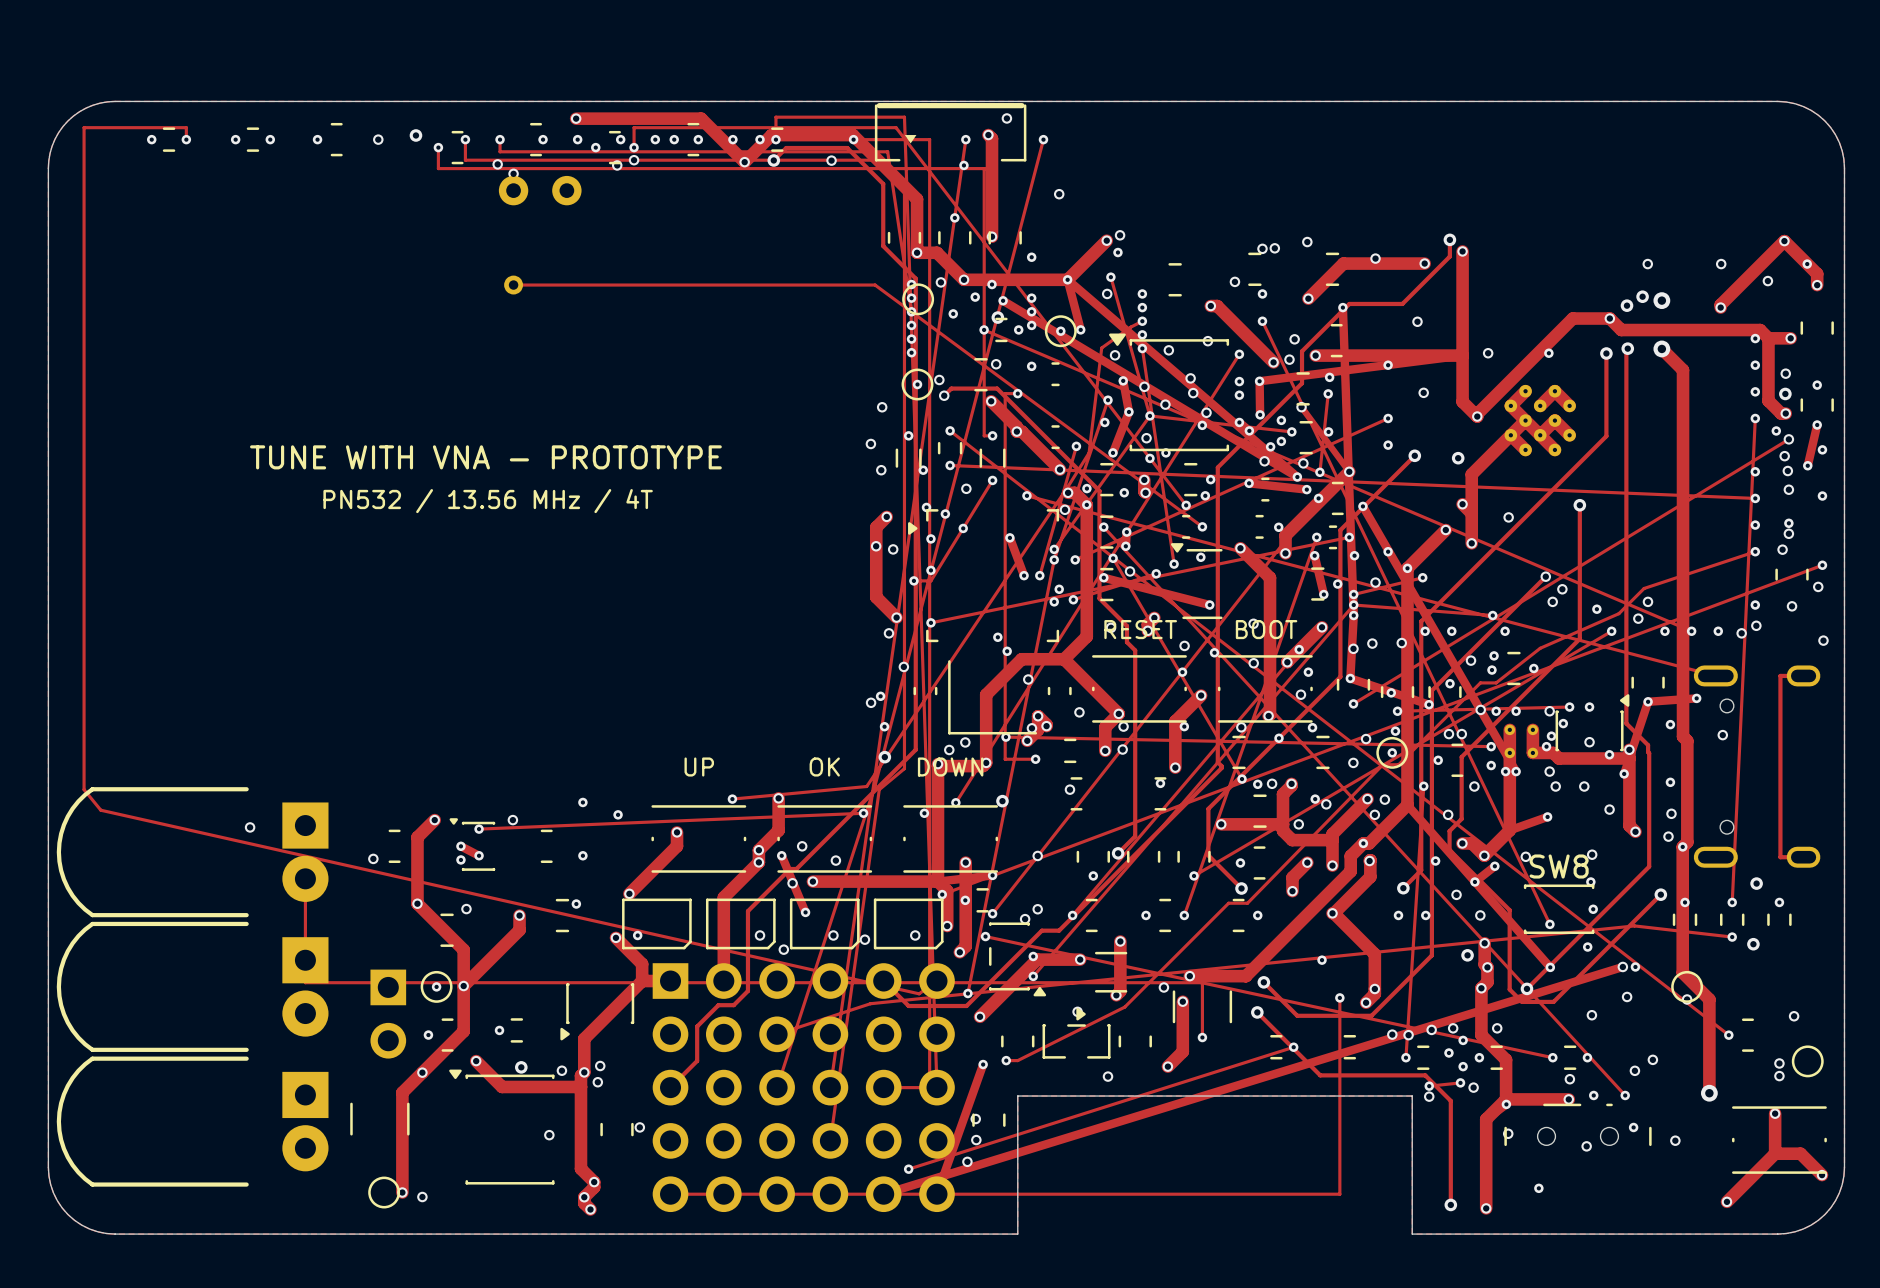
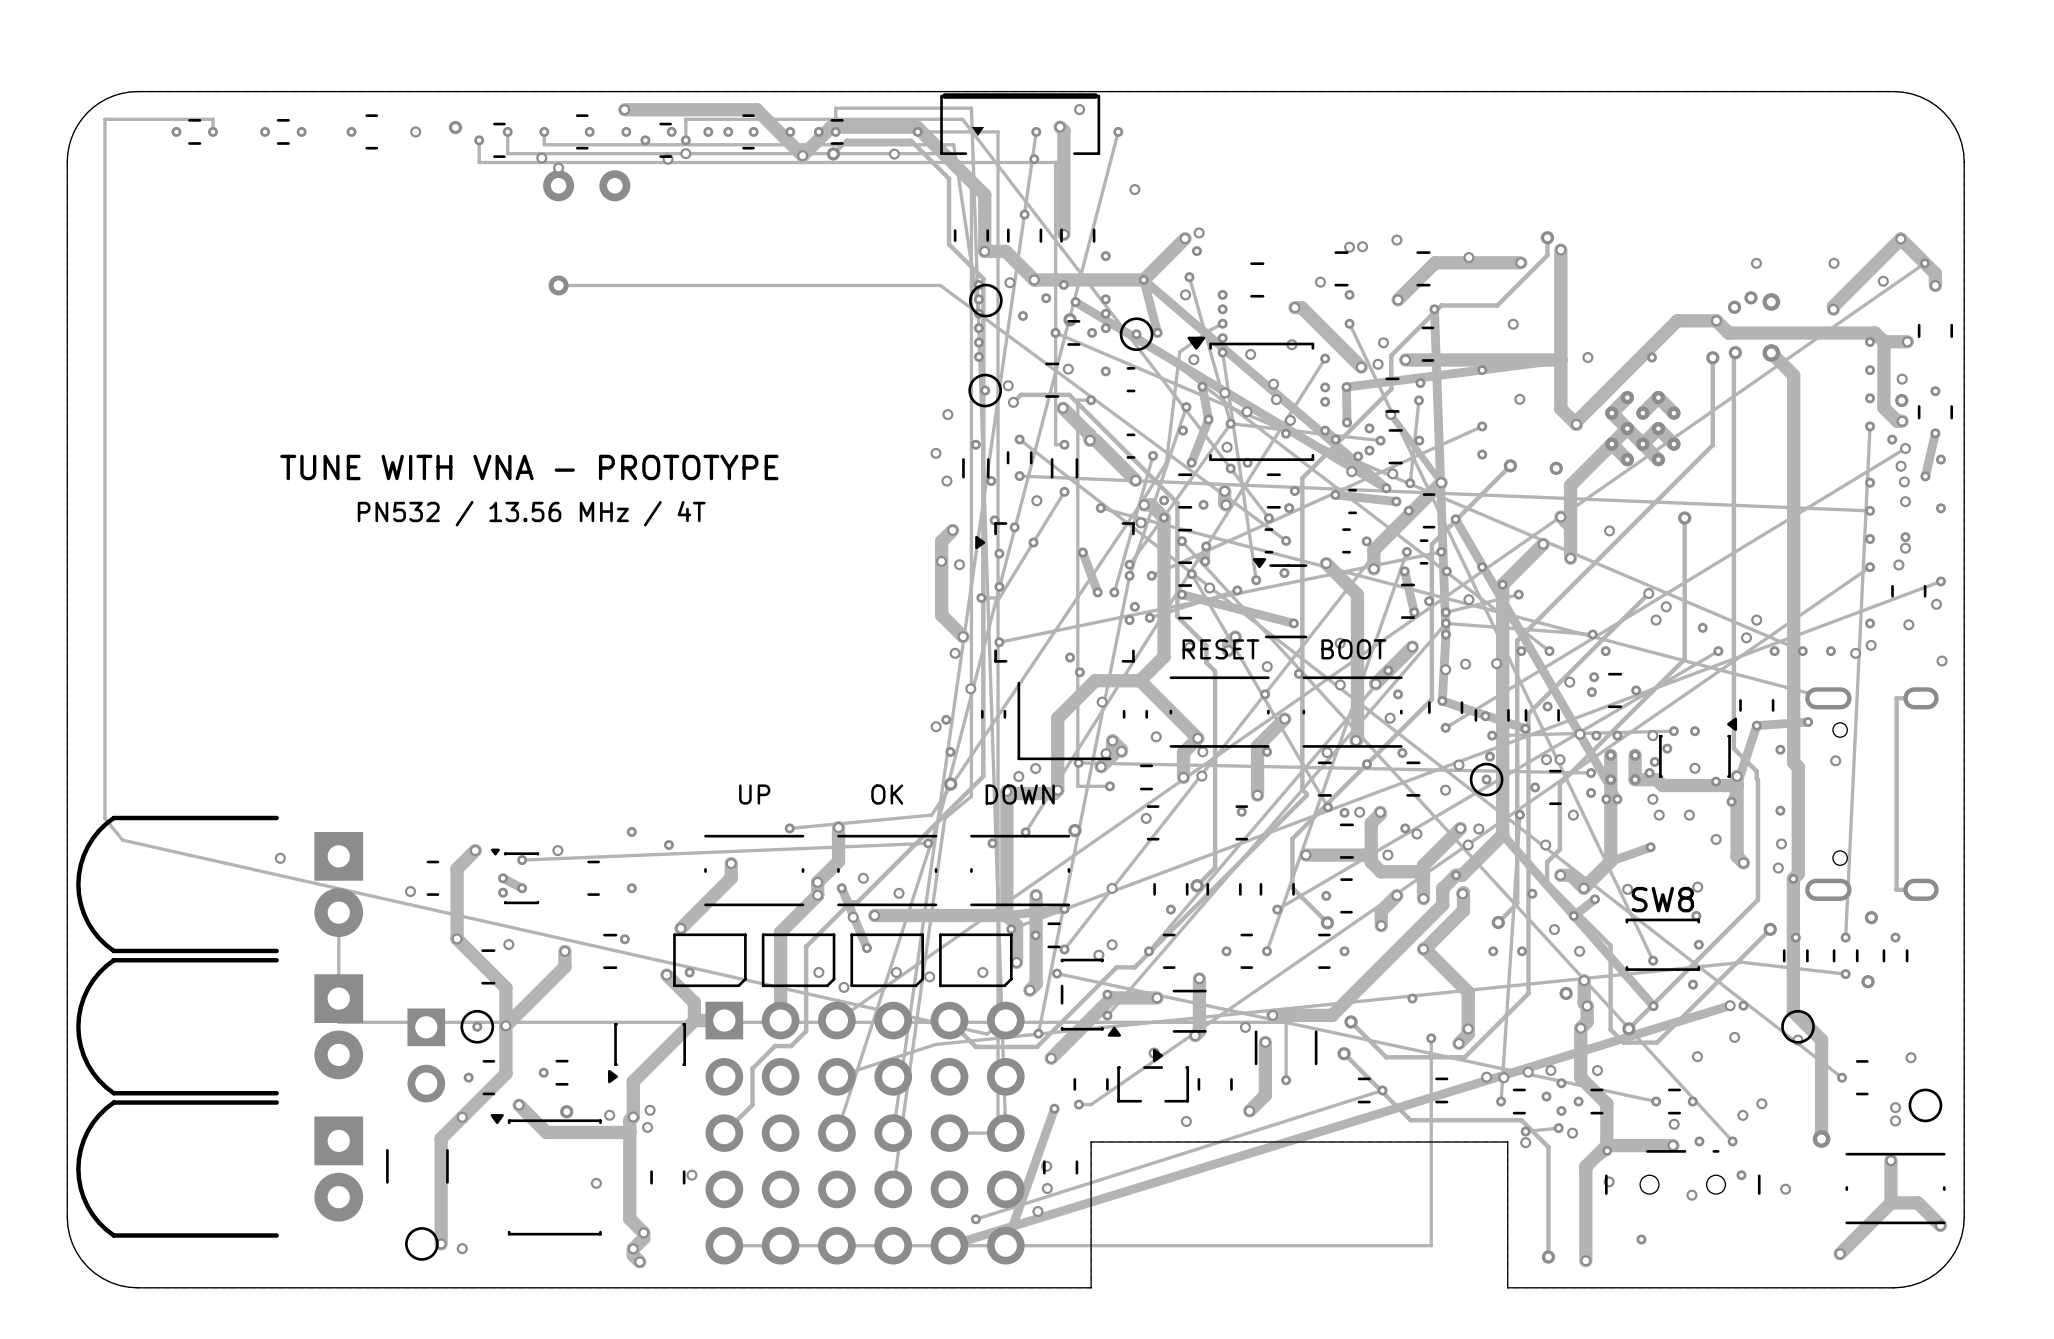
track: none -> (1924, 263) (836, 1020)
track: none -> (1136, 334) (1549, 651)
track: (1755, 551) (1644, 588) (1618, 613) (1540, 648) (1496, 682) (1480, 682) (1398, 764) (1382, 764) (1247, 903) (1228, 903) (1124, 1007) (1017, 1060) -> (1870, 567) (1091, 1104)

